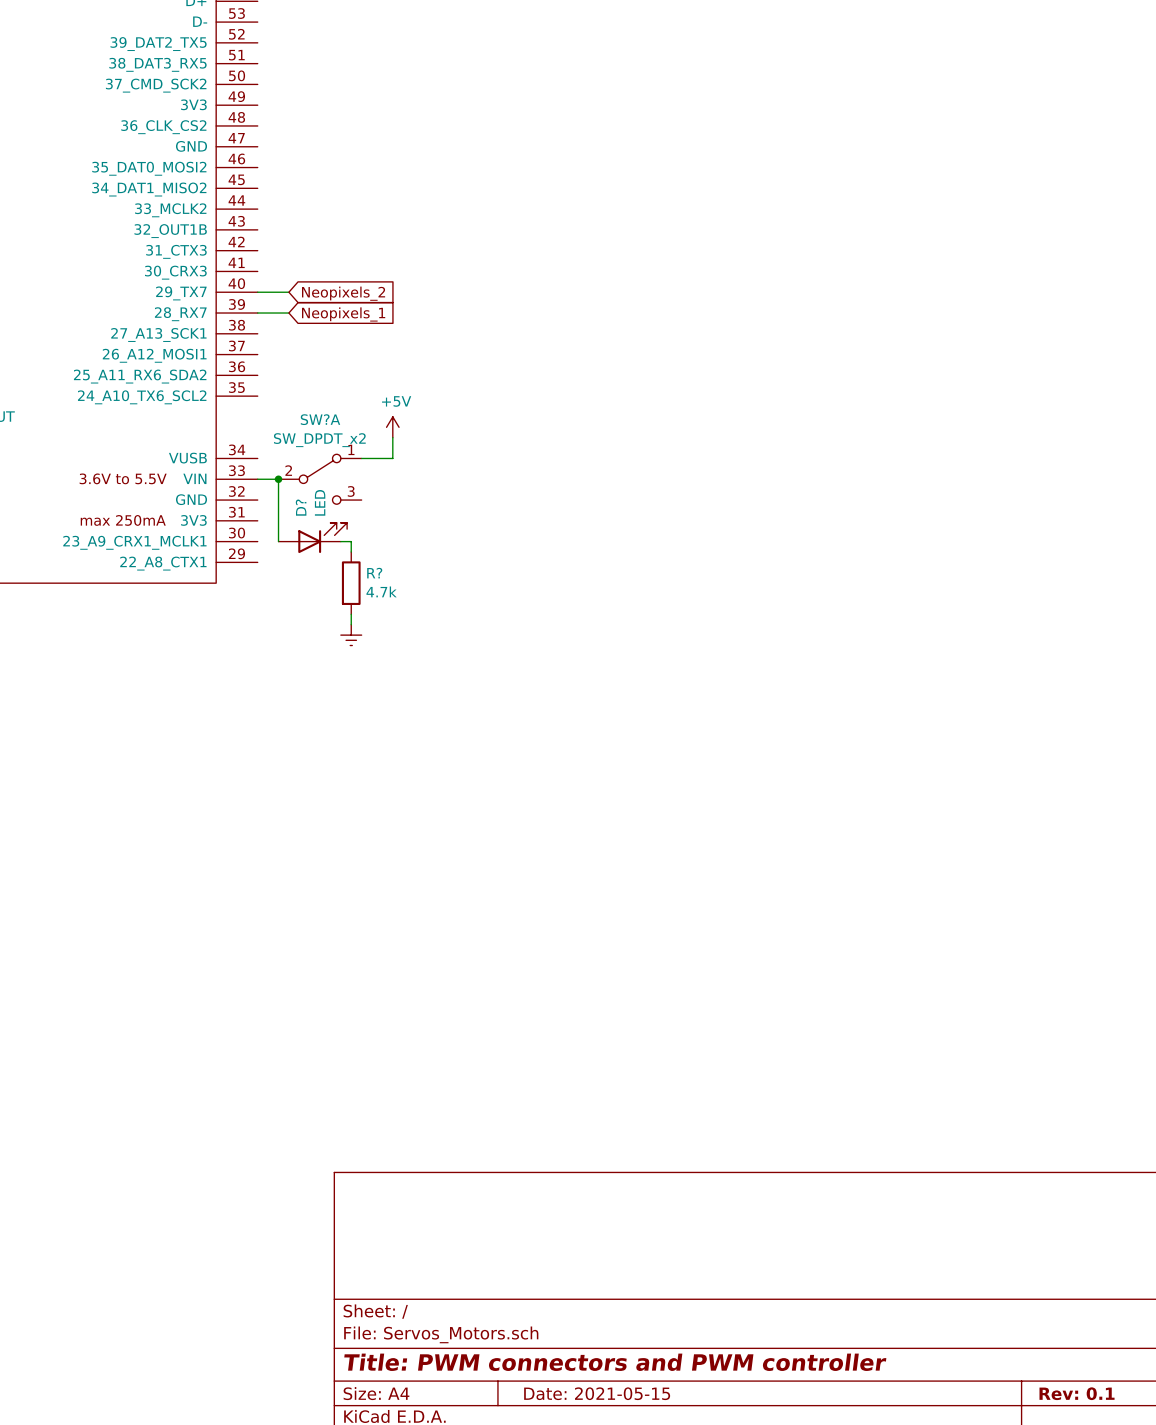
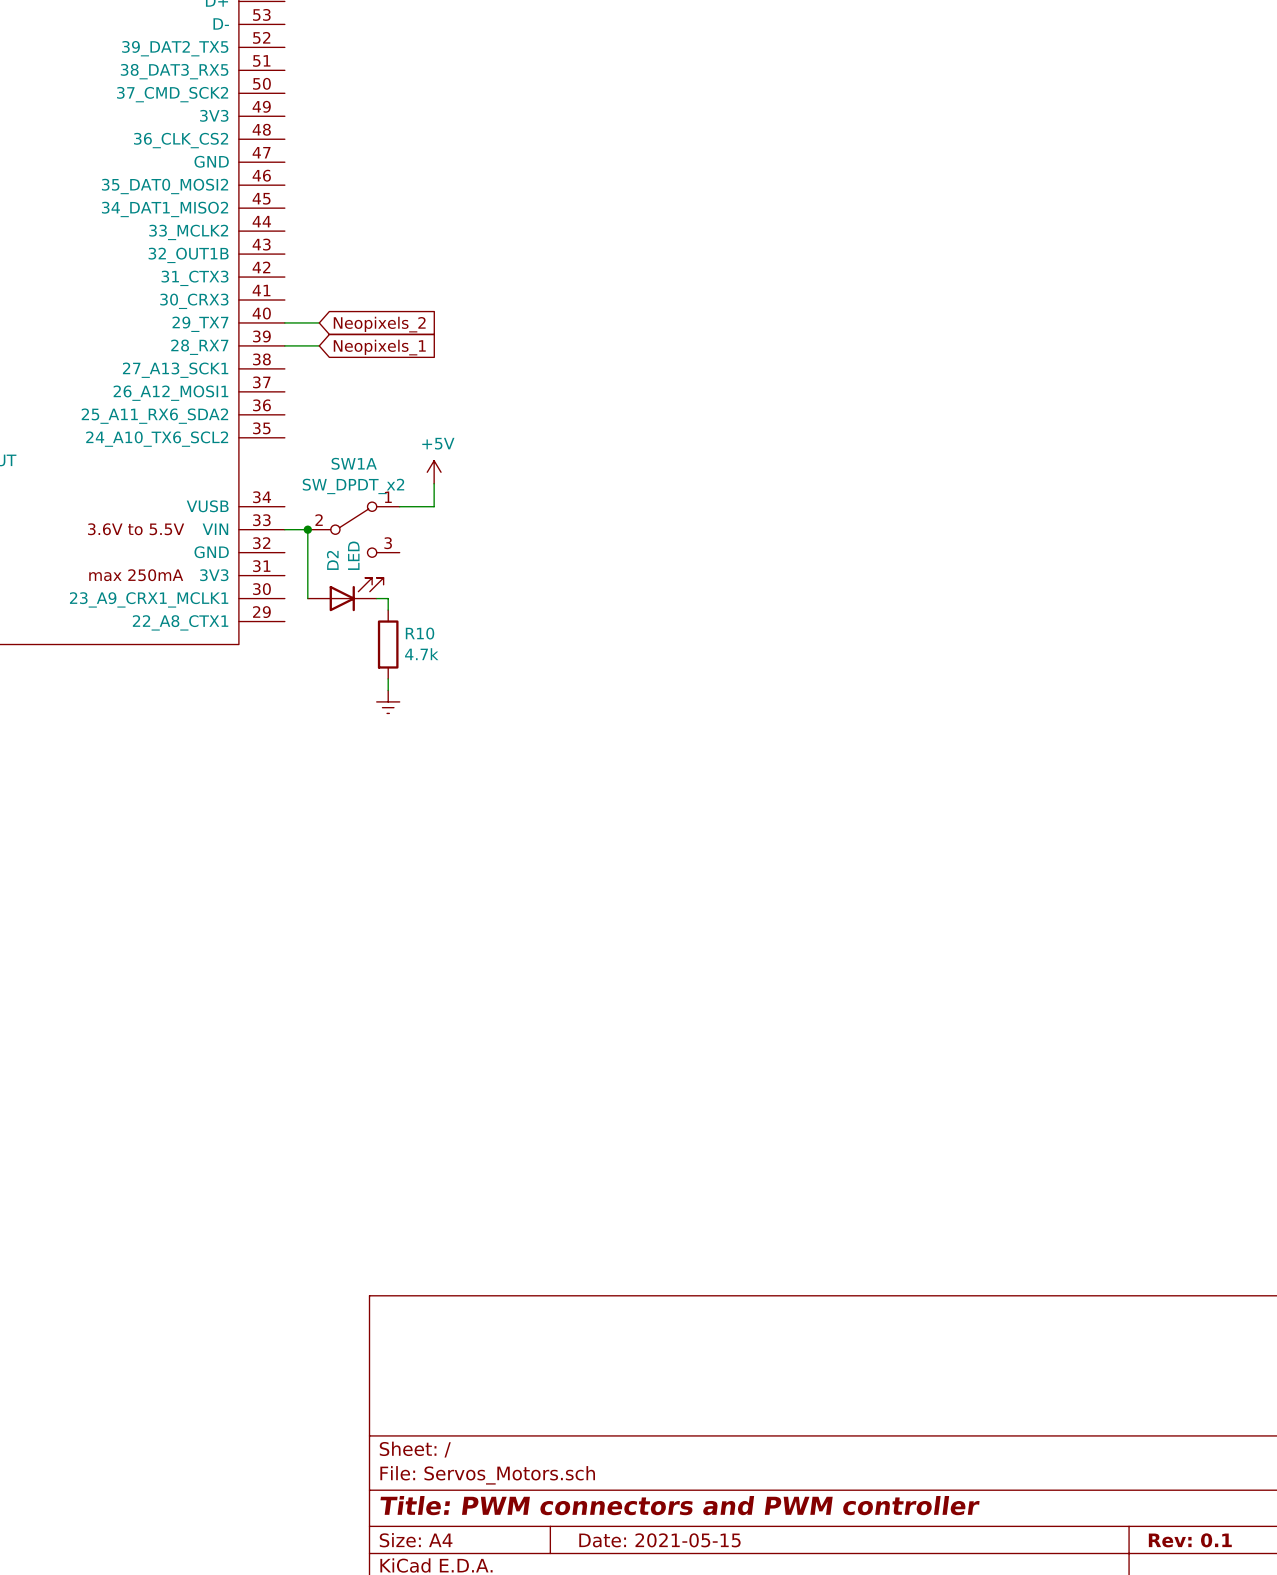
SW?A name: SW?A (320, 419) -> SW1A (354, 463)
D? name: D? (301, 507) -> D2 (332, 560)
R? name: R? (374, 573) -> R10 (420, 633)

